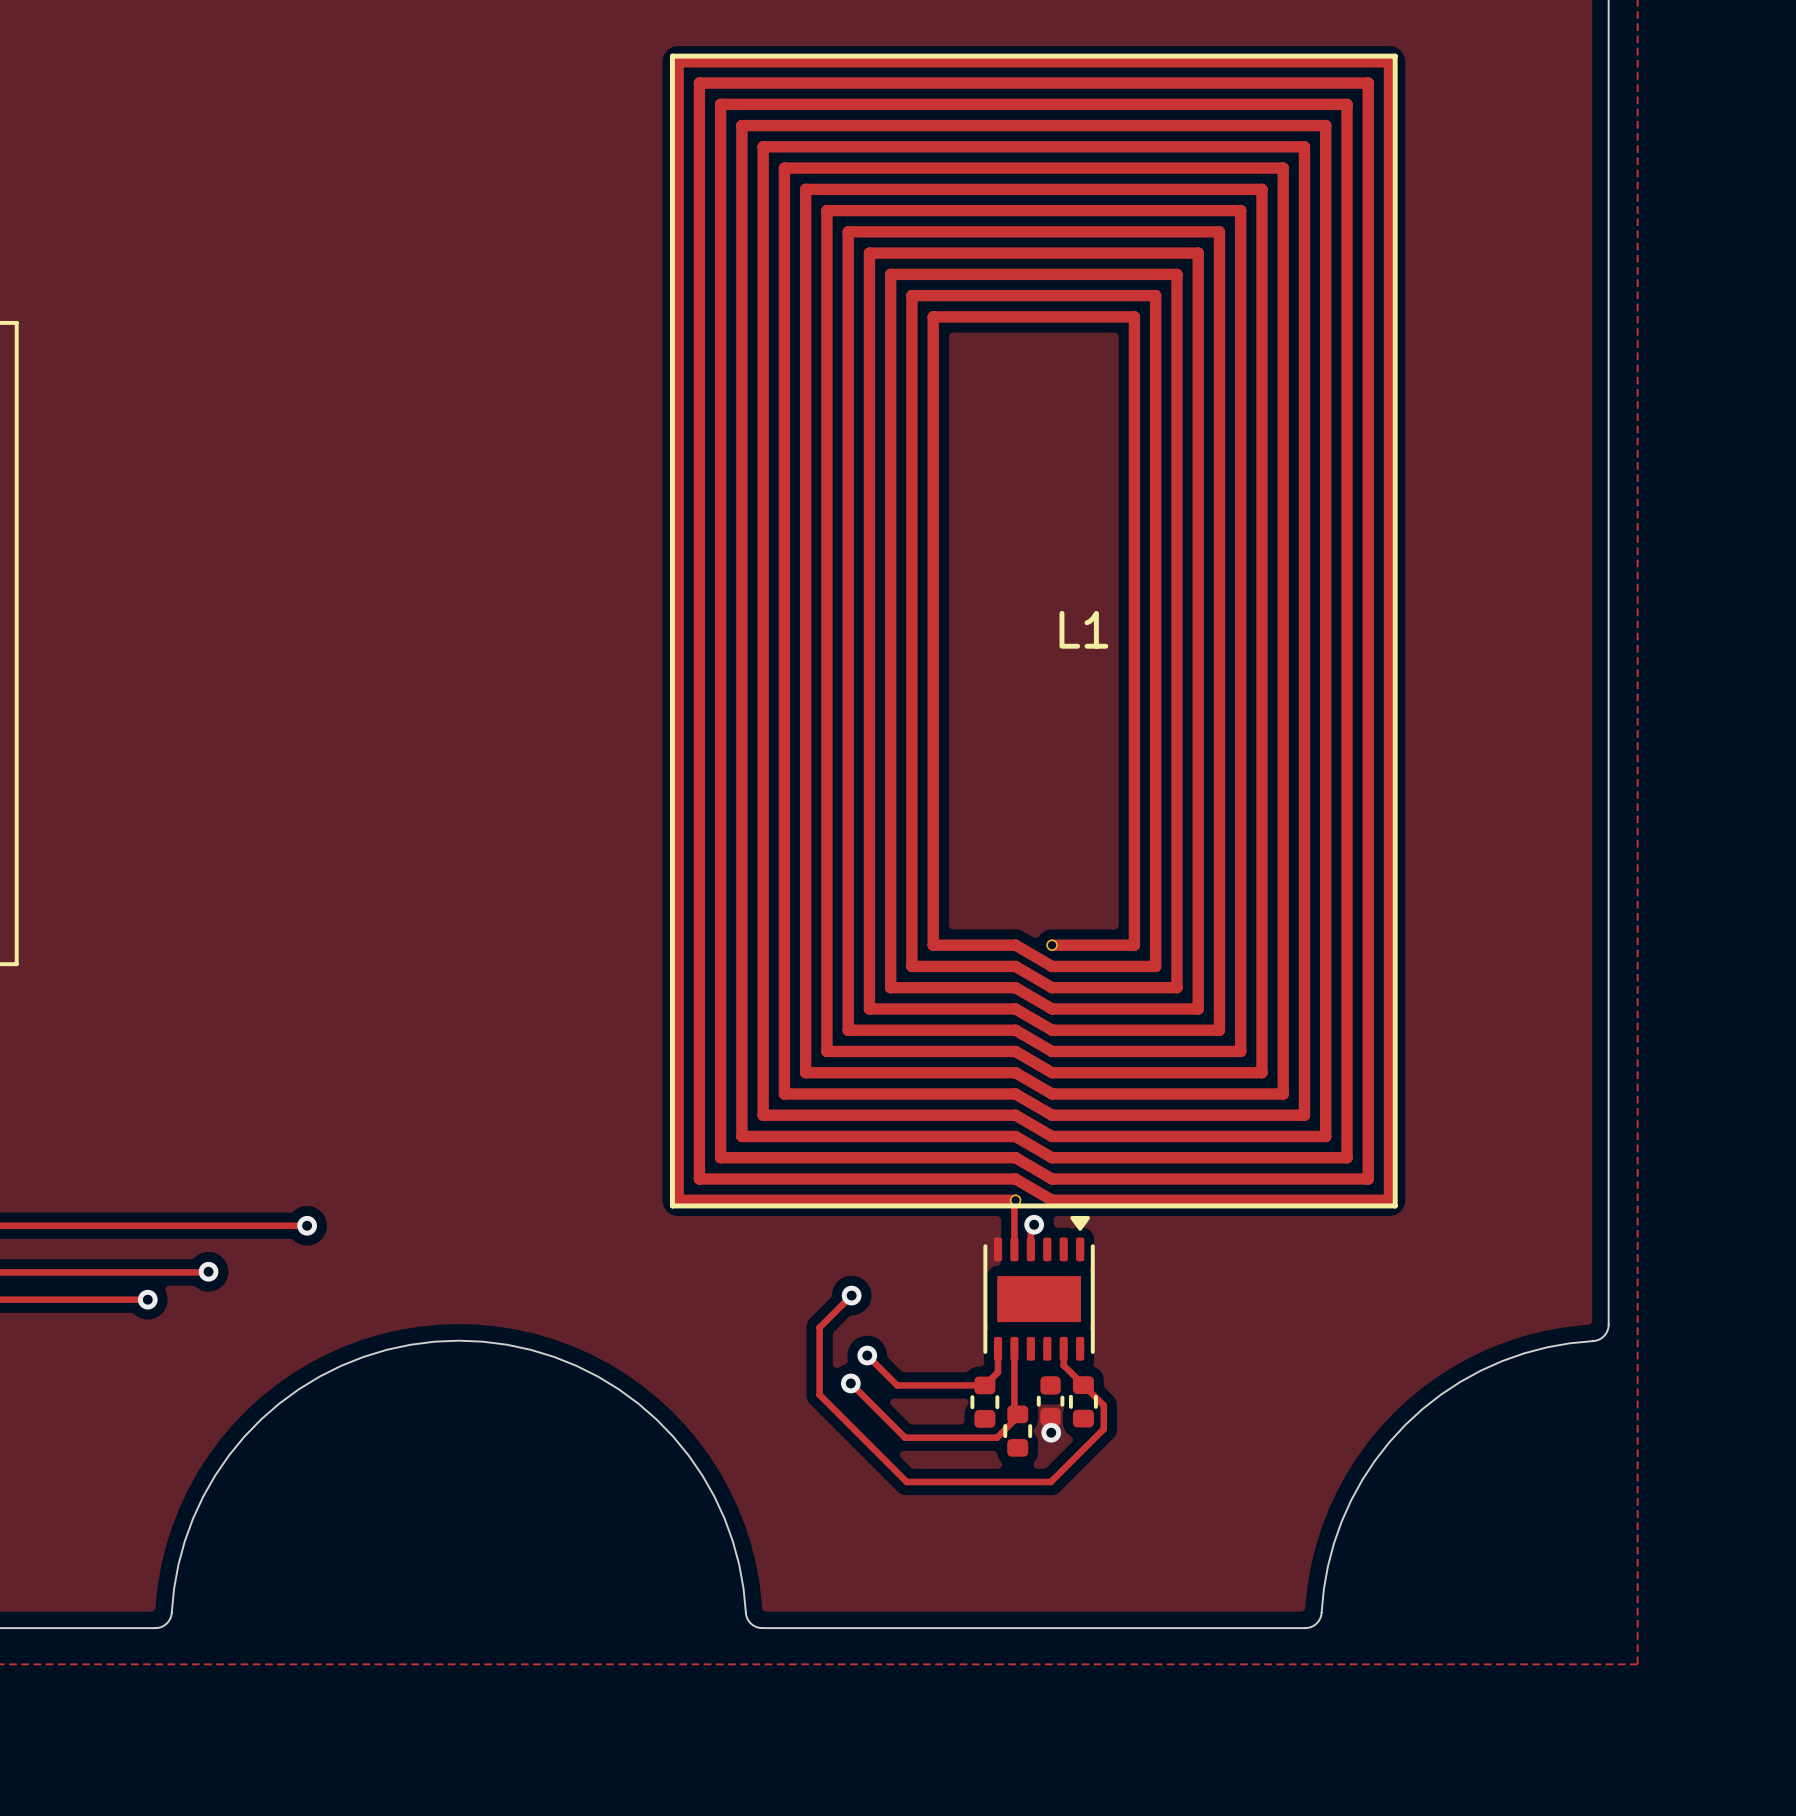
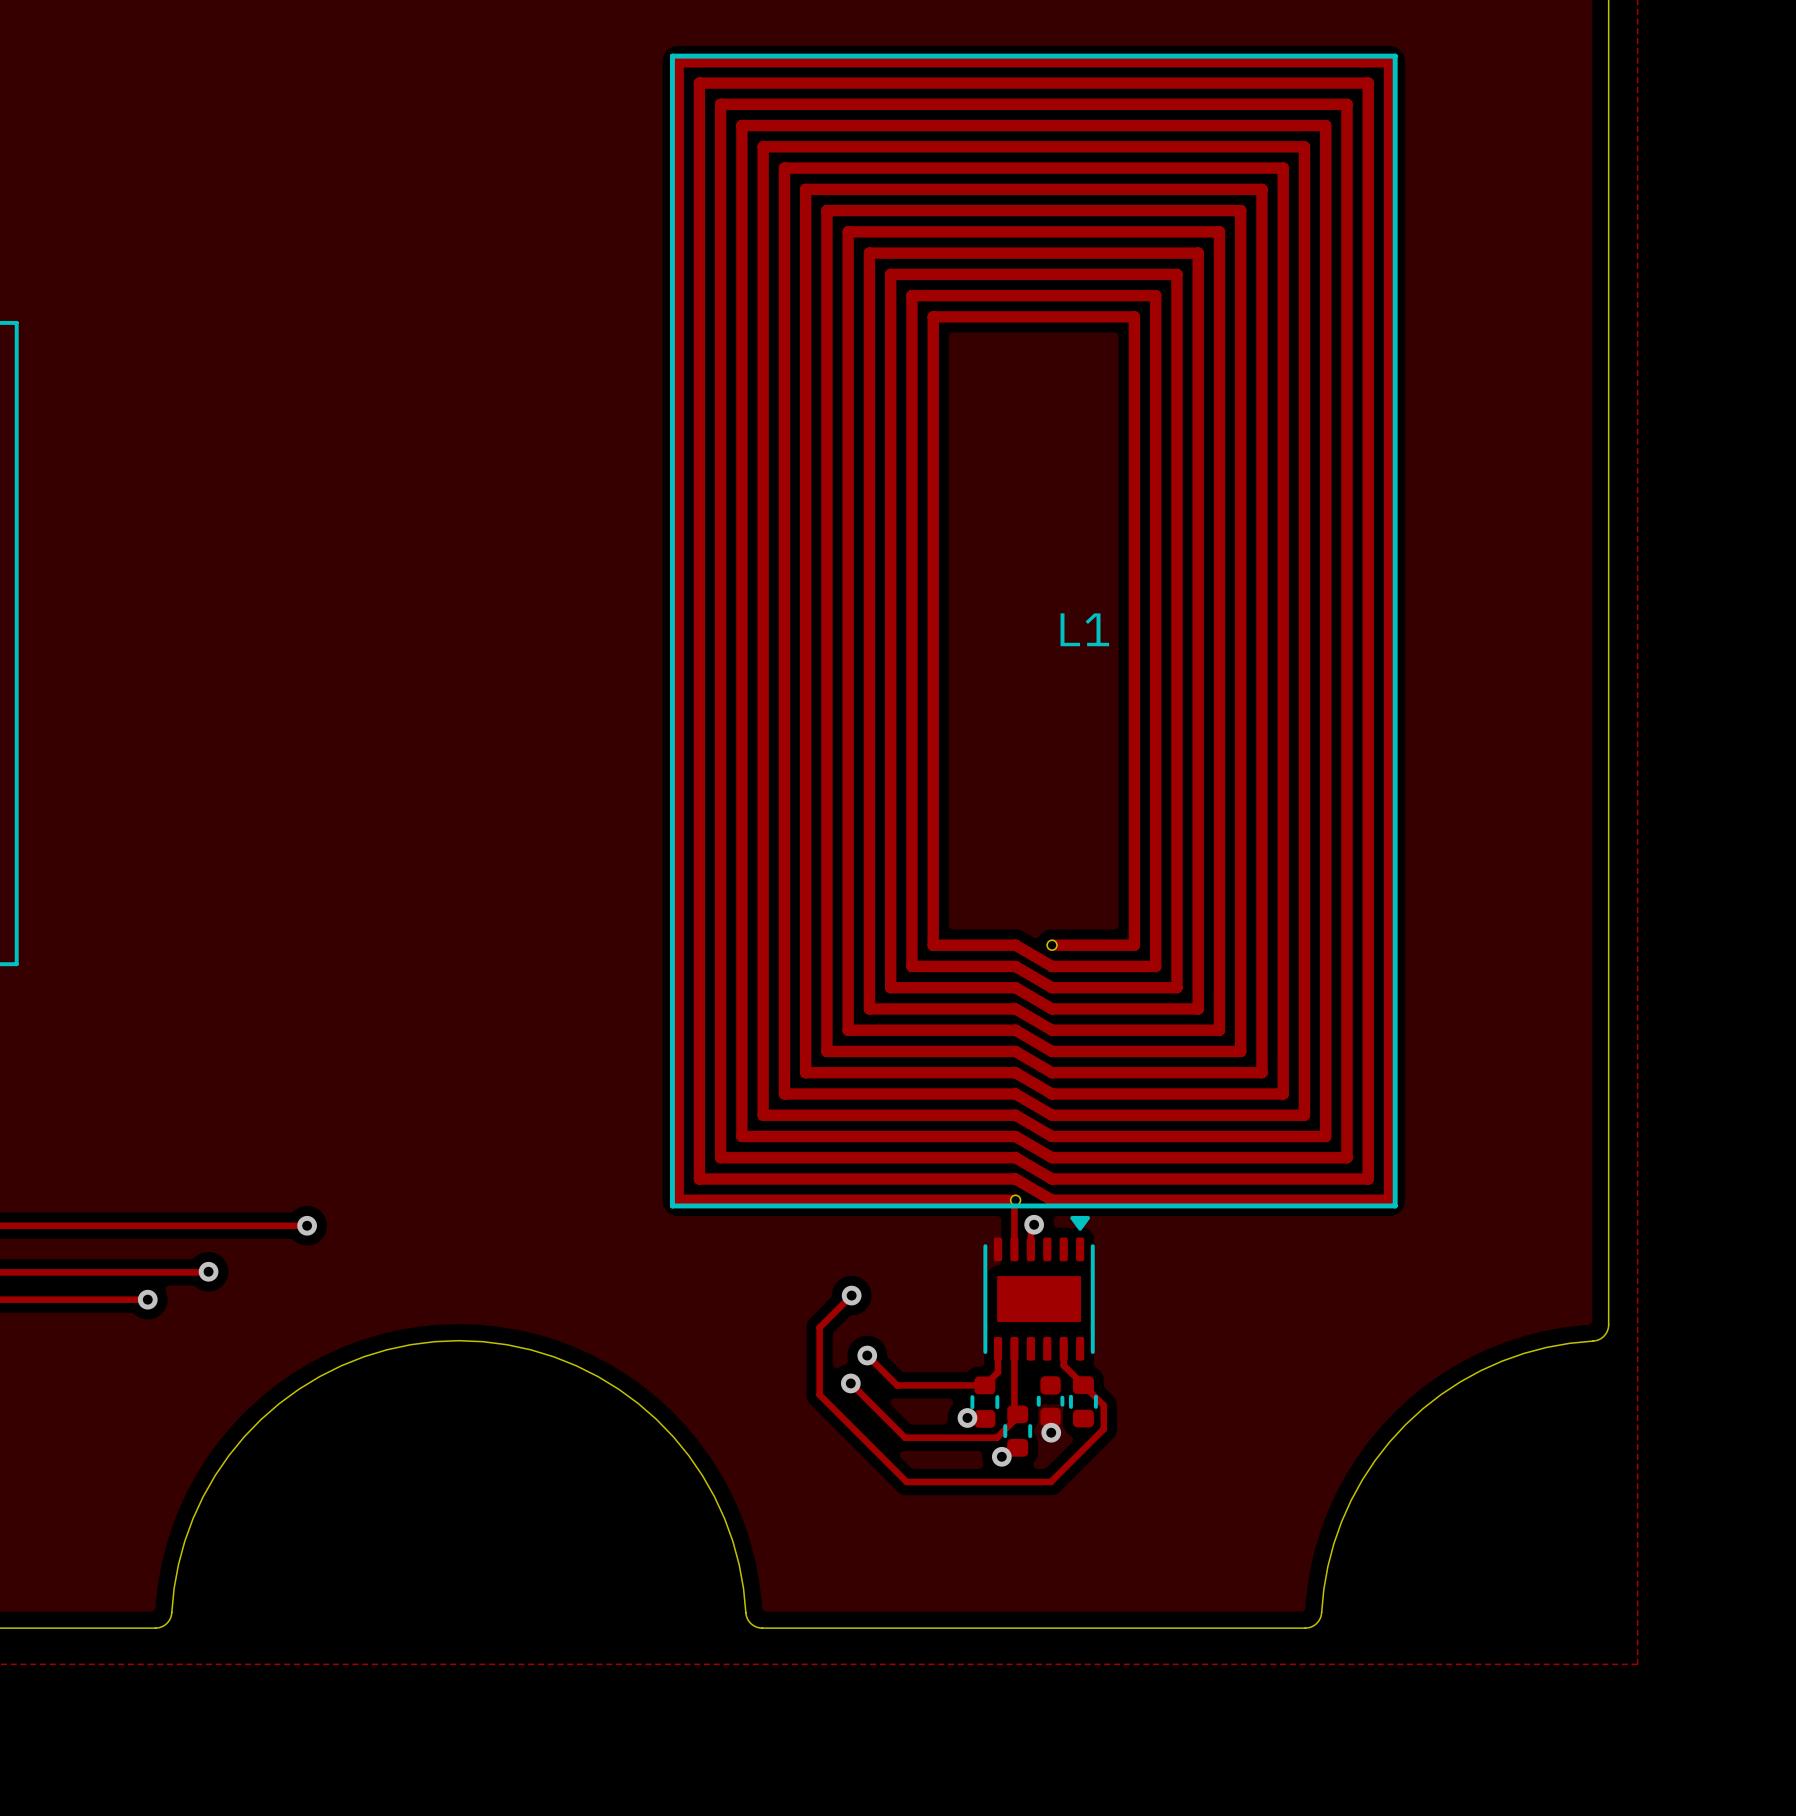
via: none -> (967, 1417)
via: none -> (1001, 1456)

